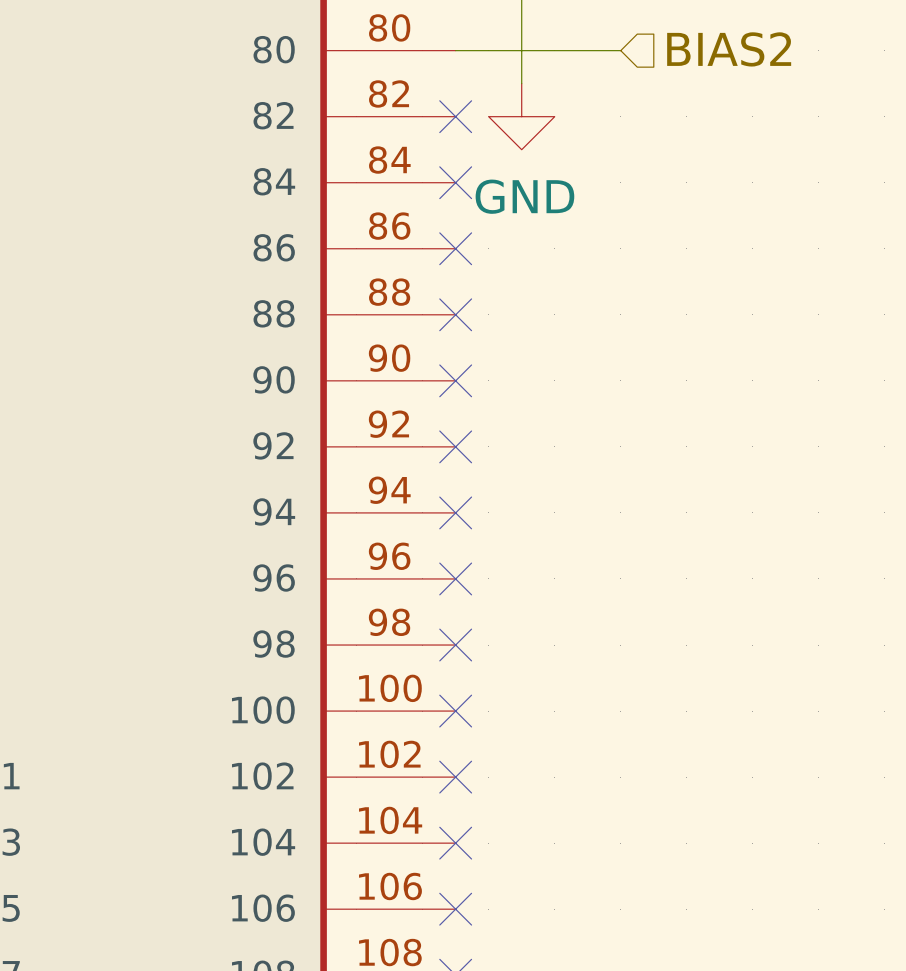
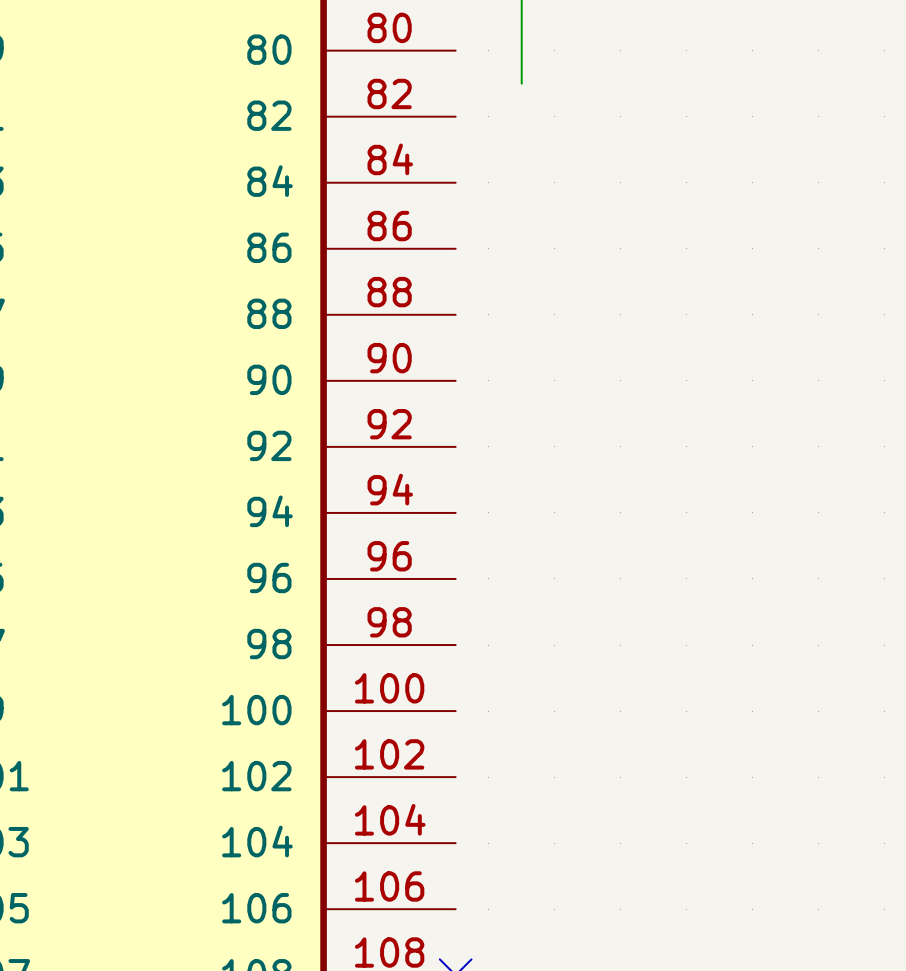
hierarchical label: BIAS2 (729, 49) -> none
wire: (455, 50) (620, 50) -> none
no-connect mark: (455, 116) -> none
power symbol: GND (521, 116) -> none
no-connect mark: (455, 182) -> none
no-connect mark: (455, 248) -> none
no-connect mark: (455, 314) -> none
no-connect mark: (455, 380) -> none
no-connect mark: (455, 446) -> none
no-connect mark: (455, 512) -> none
no-connect mark: (455, 578) -> none
no-connect mark: (455, 645) -> none
no-connect mark: (455, 711) -> none
no-connect mark: (455, 777) -> none
no-connect mark: (455, 843) -> none
no-connect mark: (455, 909) -> none

